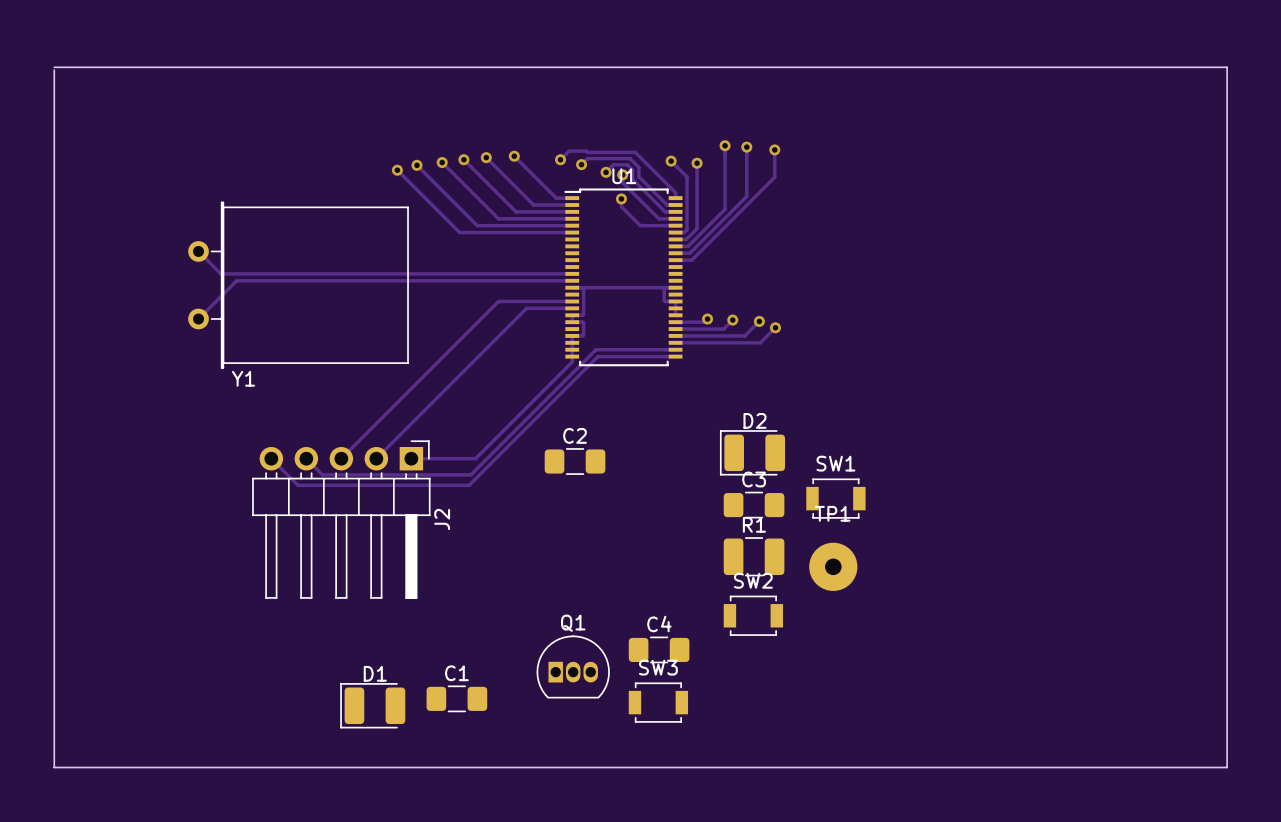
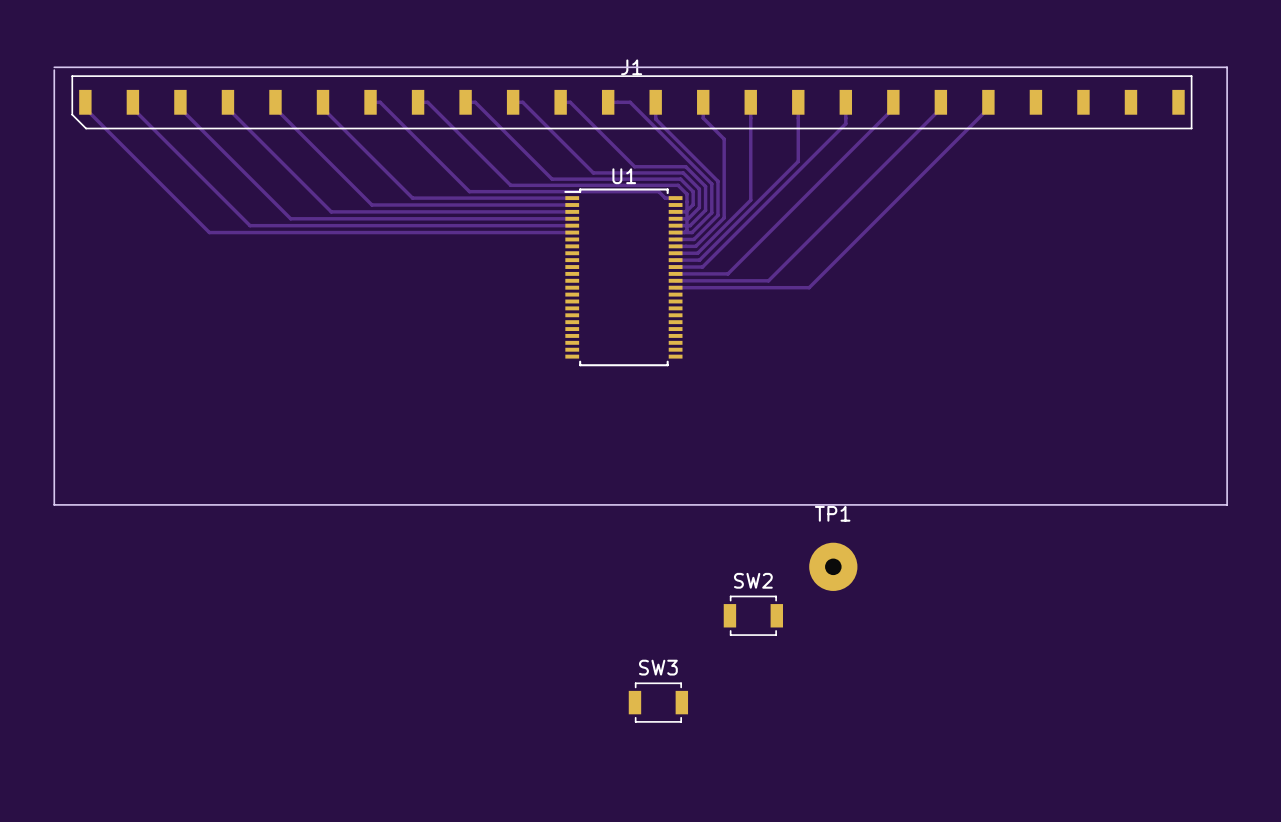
track: none -> (608, 102) (630, 102) (711, 183) (711, 212) (692, 232) (684, 232)
J1: none -> (631, 102)
track: none -> (845, 102) (845, 123) (702, 267) (675, 267)
track: none -> (893, 102) (893, 108) (727, 273) (675, 273)
track: none -> (940, 102) (940, 108) (768, 280) (675, 280)
track: (725, 145) (725, 209) (688, 246) -> (703, 102) (703, 118) (724, 139) (724, 217) (695, 246) (688, 246)
via: (725, 145) -> none
track: (746, 147) (746, 196) (690, 253) -> (750, 102) (750, 200) (697, 253) (690, 253)
via: (746, 147) -> none
track: (774, 149) (774, 177) (691, 260) -> (798, 102) (798, 161) (699, 260) (691, 260)
via: (774, 149) -> none
track: (514, 156) (556, 198) -> (323, 102) (323, 108) (412, 198) (556, 198)
via: (514, 156) -> none
track: (486, 157) (533, 205) -> (275, 102) (275, 108) (371, 205) (533, 205)
via: (486, 157) -> none
track: (463, 159) (516, 211) -> (227, 102) (227, 108) (331, 211) (516, 211)
via: (463, 159) -> none
track: (560, 159) (569, 151) (635, 152) (675, 192) (675, 198) -> (370, 102) (380, 102) (469, 191) (658, 191) (665, 198) (675, 198)
via: (560, 159) -> none
track: (671, 161) (686, 176) (686, 194) -> (418, 102) (427, 102) (510, 185) (678, 185) (686, 194)
via: (671, 161) -> none
track: (442, 162) (498, 218) -> (180, 102) (180, 108) (290, 218) (498, 218)
via: (442, 162) -> none
track: (697, 163) (697, 228) (686, 239) -> (655, 102) (655, 119) (717, 181) (717, 215) (693, 239) (686, 239)
via: (697, 163) -> none
track: (581, 164) (587, 158) (630, 158) (638, 167) (638, 176) (667, 205) (675, 205) -> none
via: (581, 164) -> none
track: (416, 165) (477, 225) -> (132, 102) (132, 108) (250, 225) (477, 225)
via: (416, 165) -> none
track: (397, 170) (459, 232) -> (85, 102) (85, 108) (209, 232) (459, 232)
via: (397, 170) -> none
track: (606, 172) (613, 164) (627, 164) (632, 170) (632, 179) (665, 211) (675, 211) -> (465, 102) (475, 102) (552, 179) (680, 179) (693, 191) (693, 204) (685, 211) (675, 211)
via: (606, 172) -> none
track: (622, 174) (622, 182) (658, 218) (675, 218) -> (513, 102) (522, 102) (593, 172) (683, 172) (699, 189) (699, 207) (688, 218) (675, 218)
via: (622, 174) -> none
track: (621, 198) (621, 206) (640, 225) (675, 225) -> (560, 102) (570, 102) (634, 166) (685, 166) (705, 186) (705, 210) (690, 225) (675, 225)
via: (621, 198) -> none
track: (198, 251) (220, 273) (572, 273) -> none
track: (572, 280) (236, 280) (198, 318) -> none
Y1: (298, 285) -> none
track: (572, 287) (675, 287) -> (988, 102) (988, 108) (809, 287) (675, 287)
track: (582, 287) (583, 314) (572, 315) (572, 322) (583, 323) (583, 334) (572, 335) (572, 362) (475, 458) (411, 458) -> none
track: (665, 287) (664, 300) (675, 301) (675, 315) -> none
track: (572, 301) (498, 301) (341, 458) -> none
track: (572, 308) (526, 308) (376, 458) -> none
track: (707, 319) (704, 322) (675, 322) -> none
via: (707, 319) -> none
track: (732, 320) (723, 329) (675, 329) -> none
via: (732, 320) -> none
track: (759, 321) (744, 335) (675, 335) -> none
via: (759, 321) -> none
track: (775, 327) (760, 342) (675, 342) -> none
via: (775, 327) -> none
track: (675, 349) (596, 349) (470, 474) (322, 474) (306, 458) -> none
track: (675, 356) (597, 356) (469, 485) (297, 485) (271, 458) -> none
D2: (752, 452) -> none
C2: (575, 461) -> none
SW1: (835, 498) -> none
board edge: (54, 504) (54, 767) (1227, 767) (1227, 504) -> (54, 504) (1227, 504)
C3: (754, 505) -> none
J2: (341, 519) -> none
R1: (754, 556) -> none
C4: (659, 649) -> none
Q1: (573, 666) -> none
C1: (456, 698) -> none
D1: (372, 705) -> none

